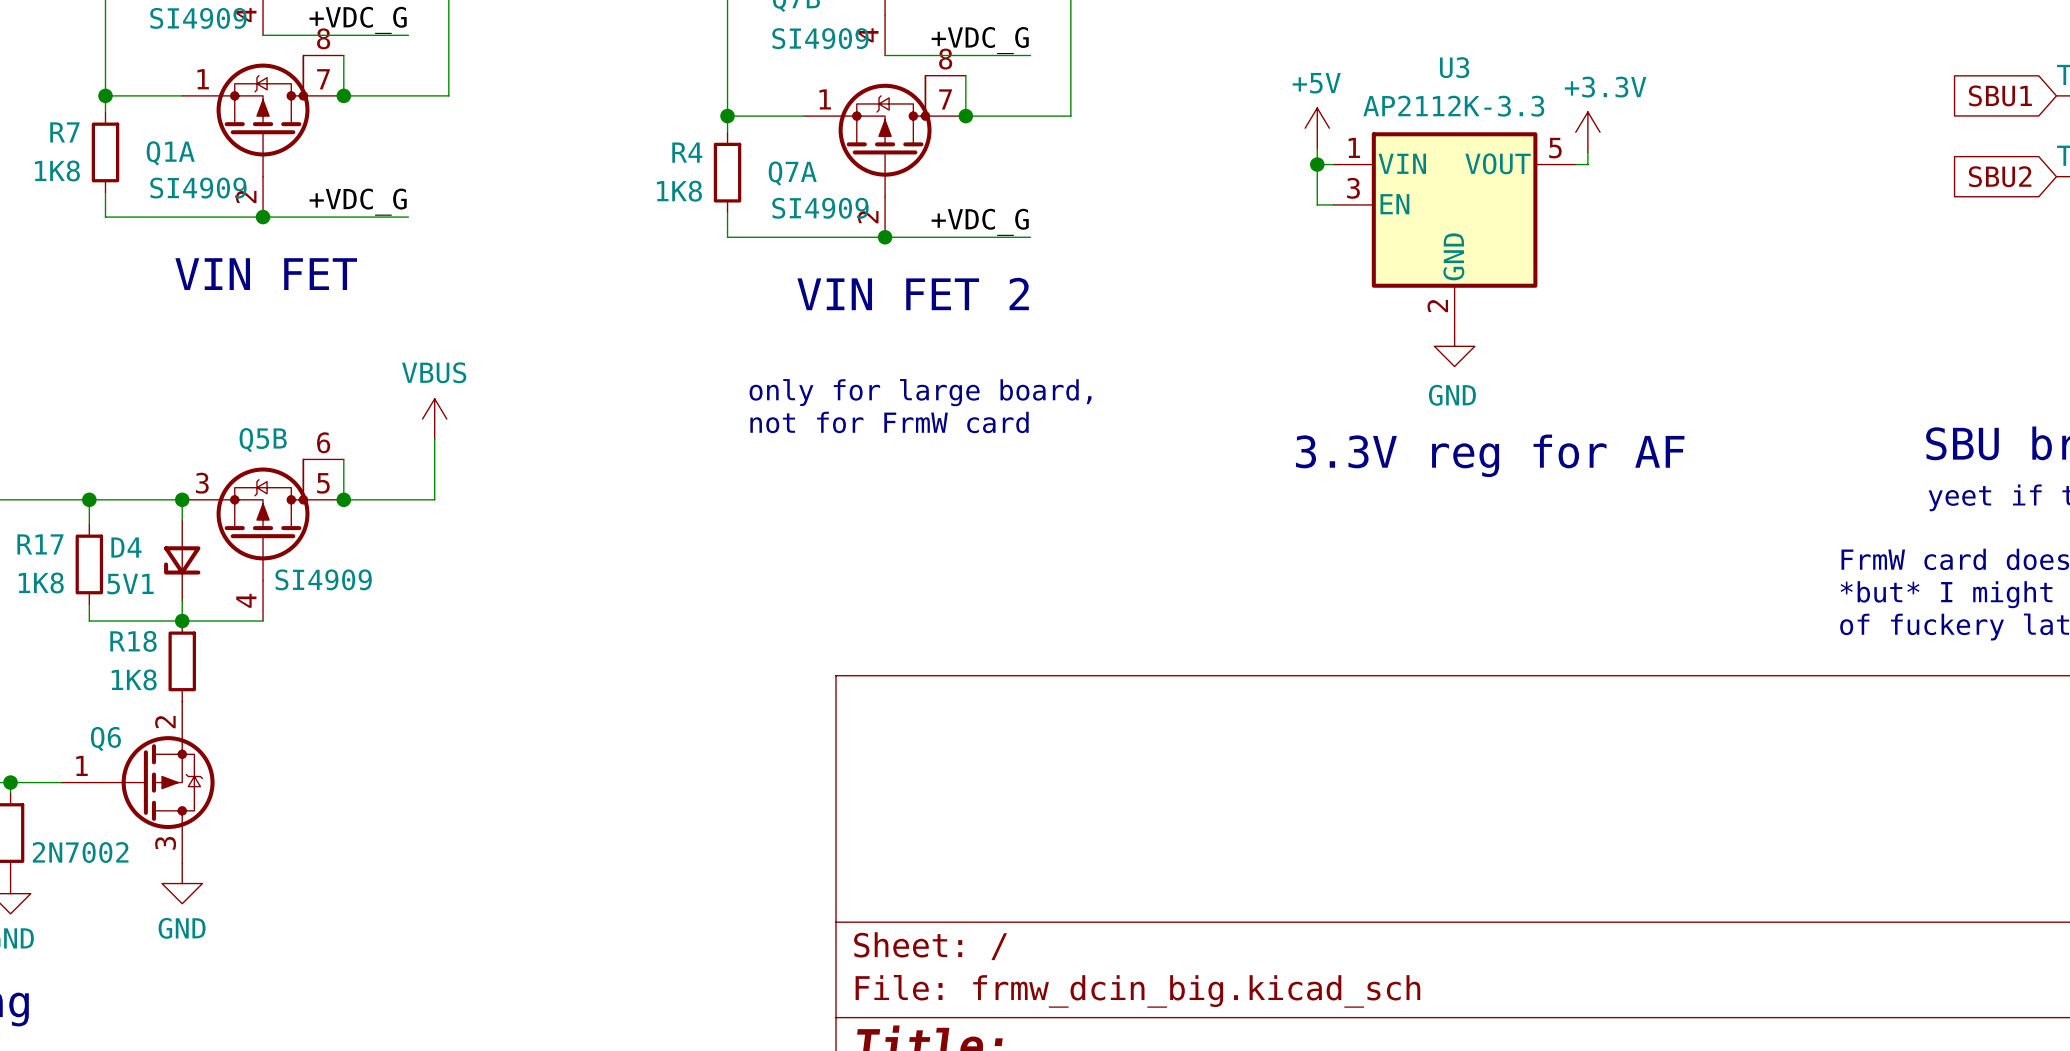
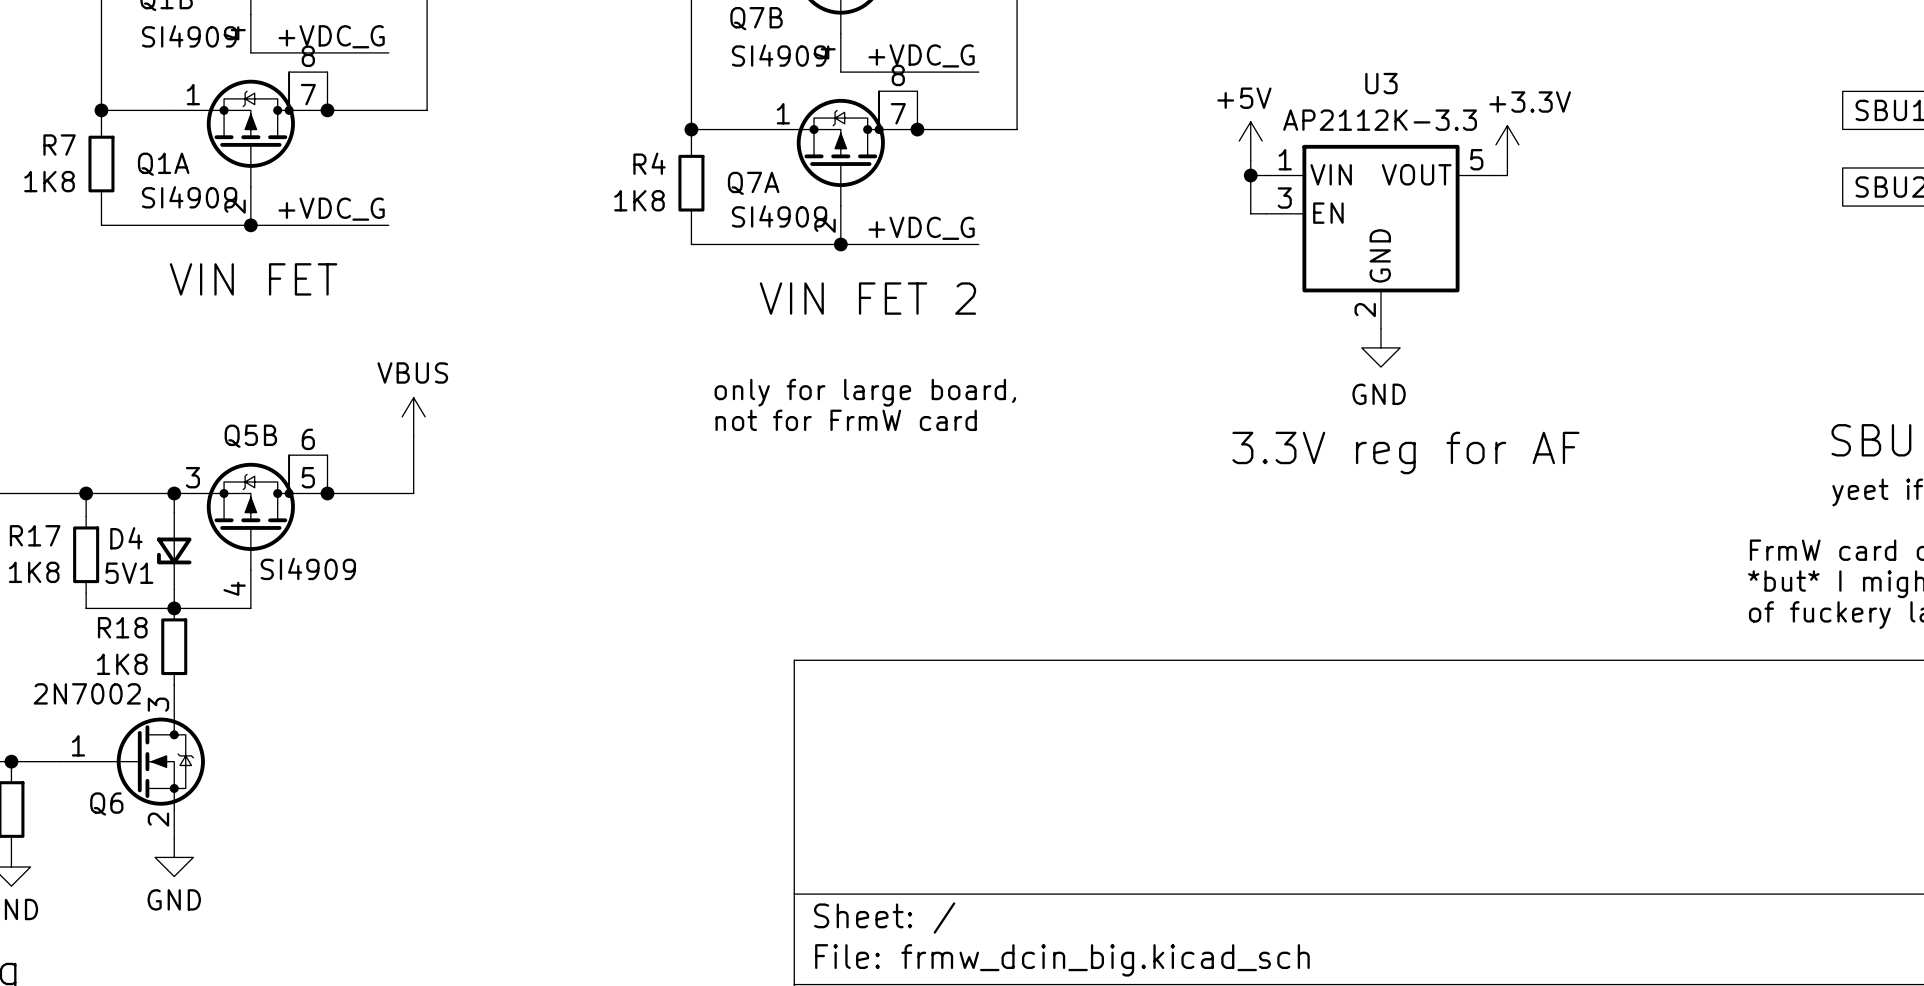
Q6 symbol: [61, 701, 215, 864] -> [59, 685, 205, 839]
Q6 name position: Q6 (105, 739) -> Q6 (106, 803)
Q6 value position: 2N7002 (80, 852) -> 2N7002 (87, 693)

